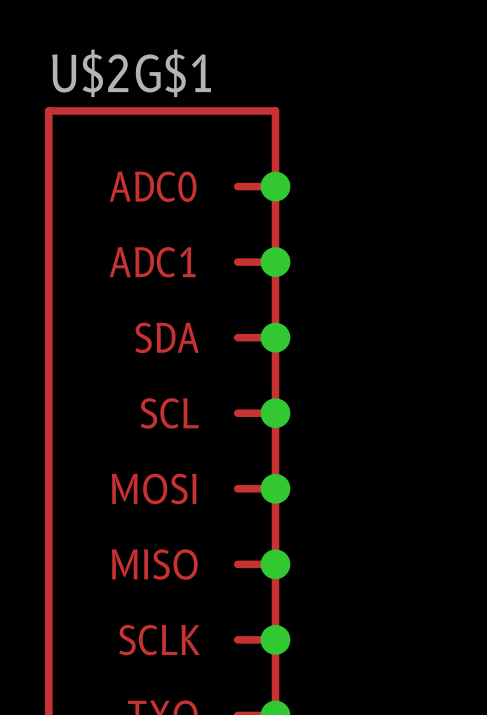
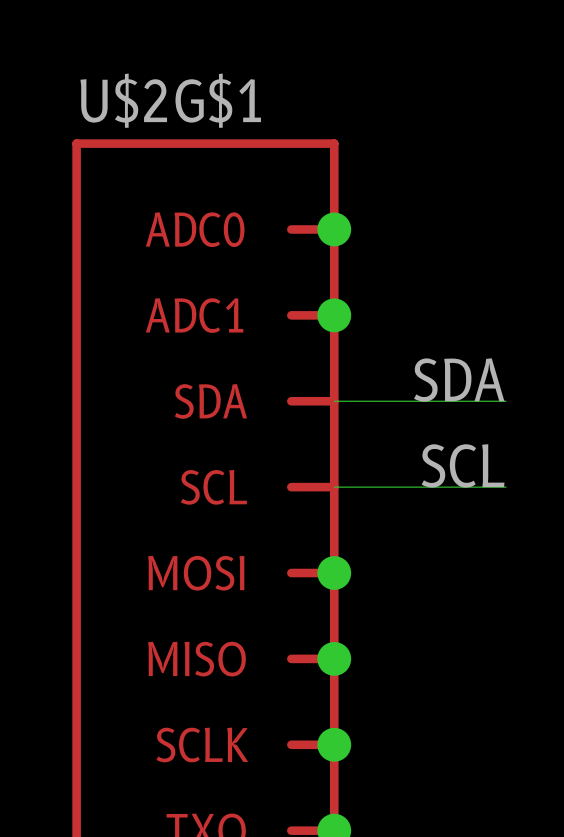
label: none -> SDA (459, 380)
wire: none -> (334, 401) (506, 401)
junction: (275, 337) -> none
label: none -> SCL (463, 465)
wire: none -> (334, 487) (506, 487)
junction: (275, 413) -> none

